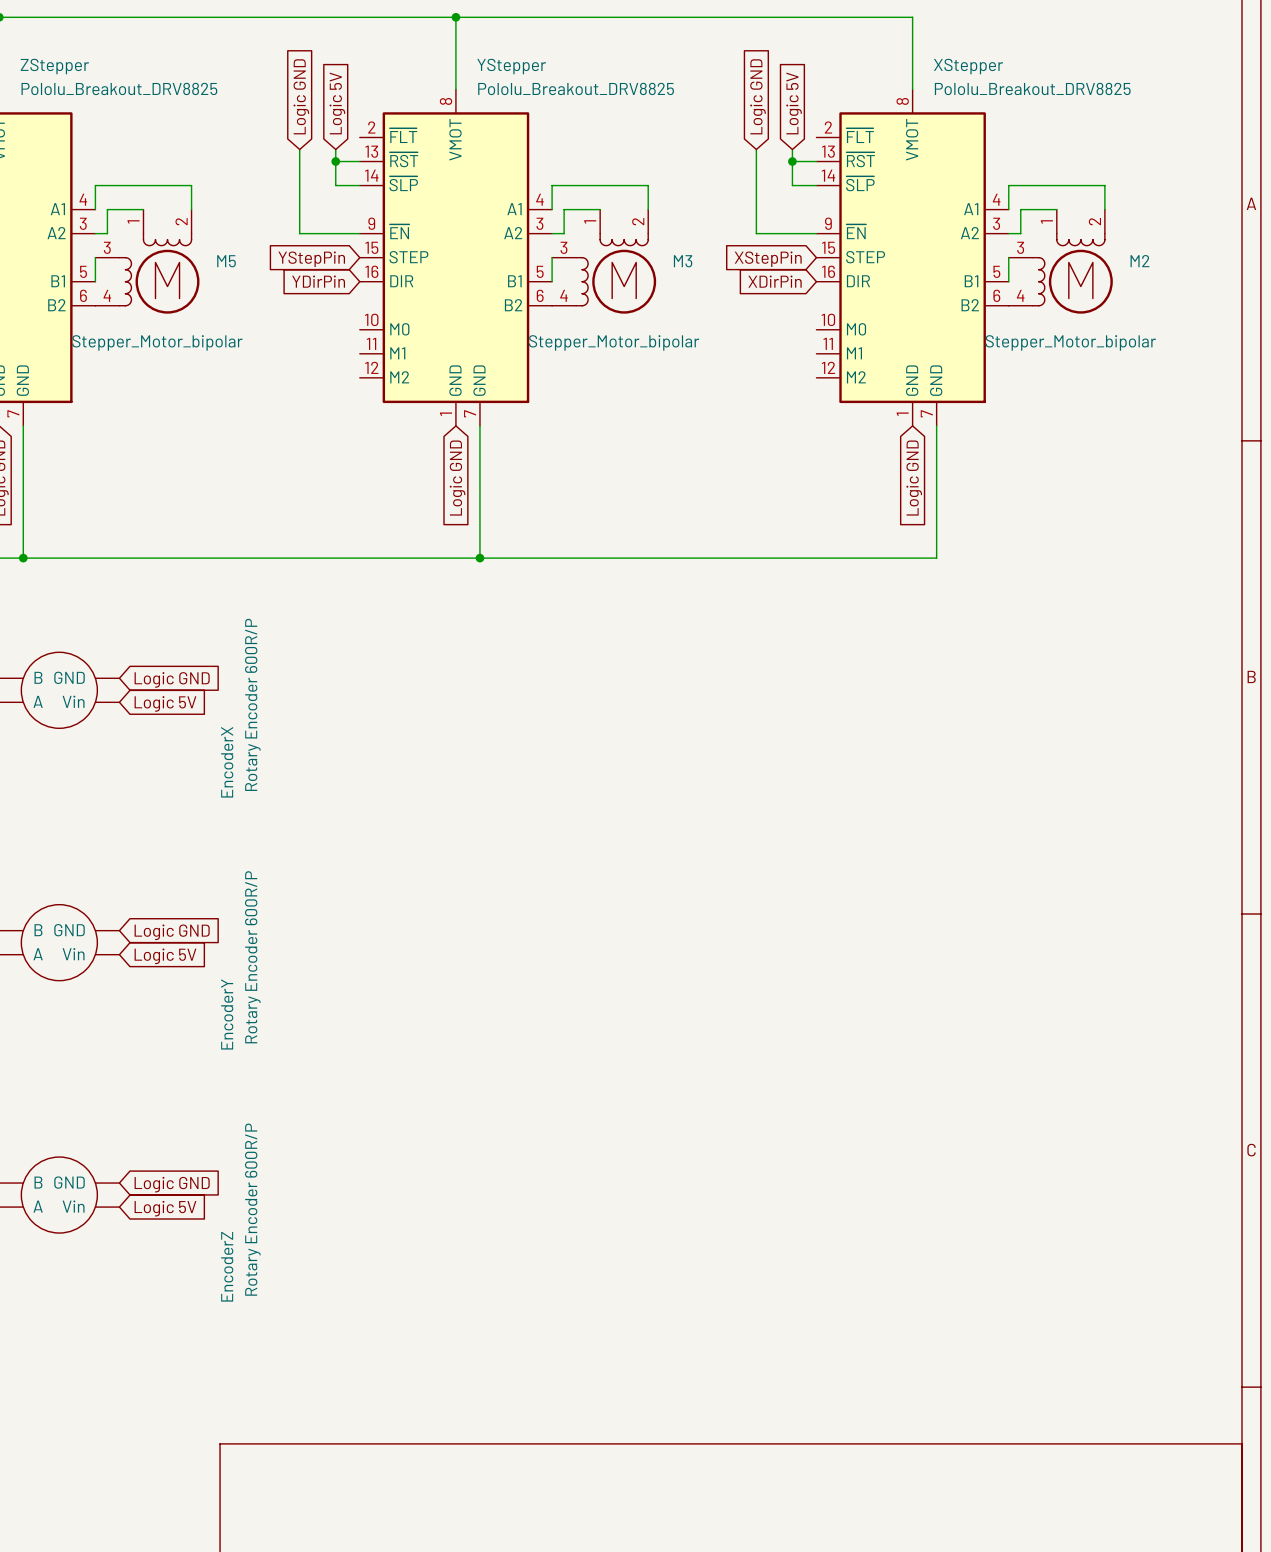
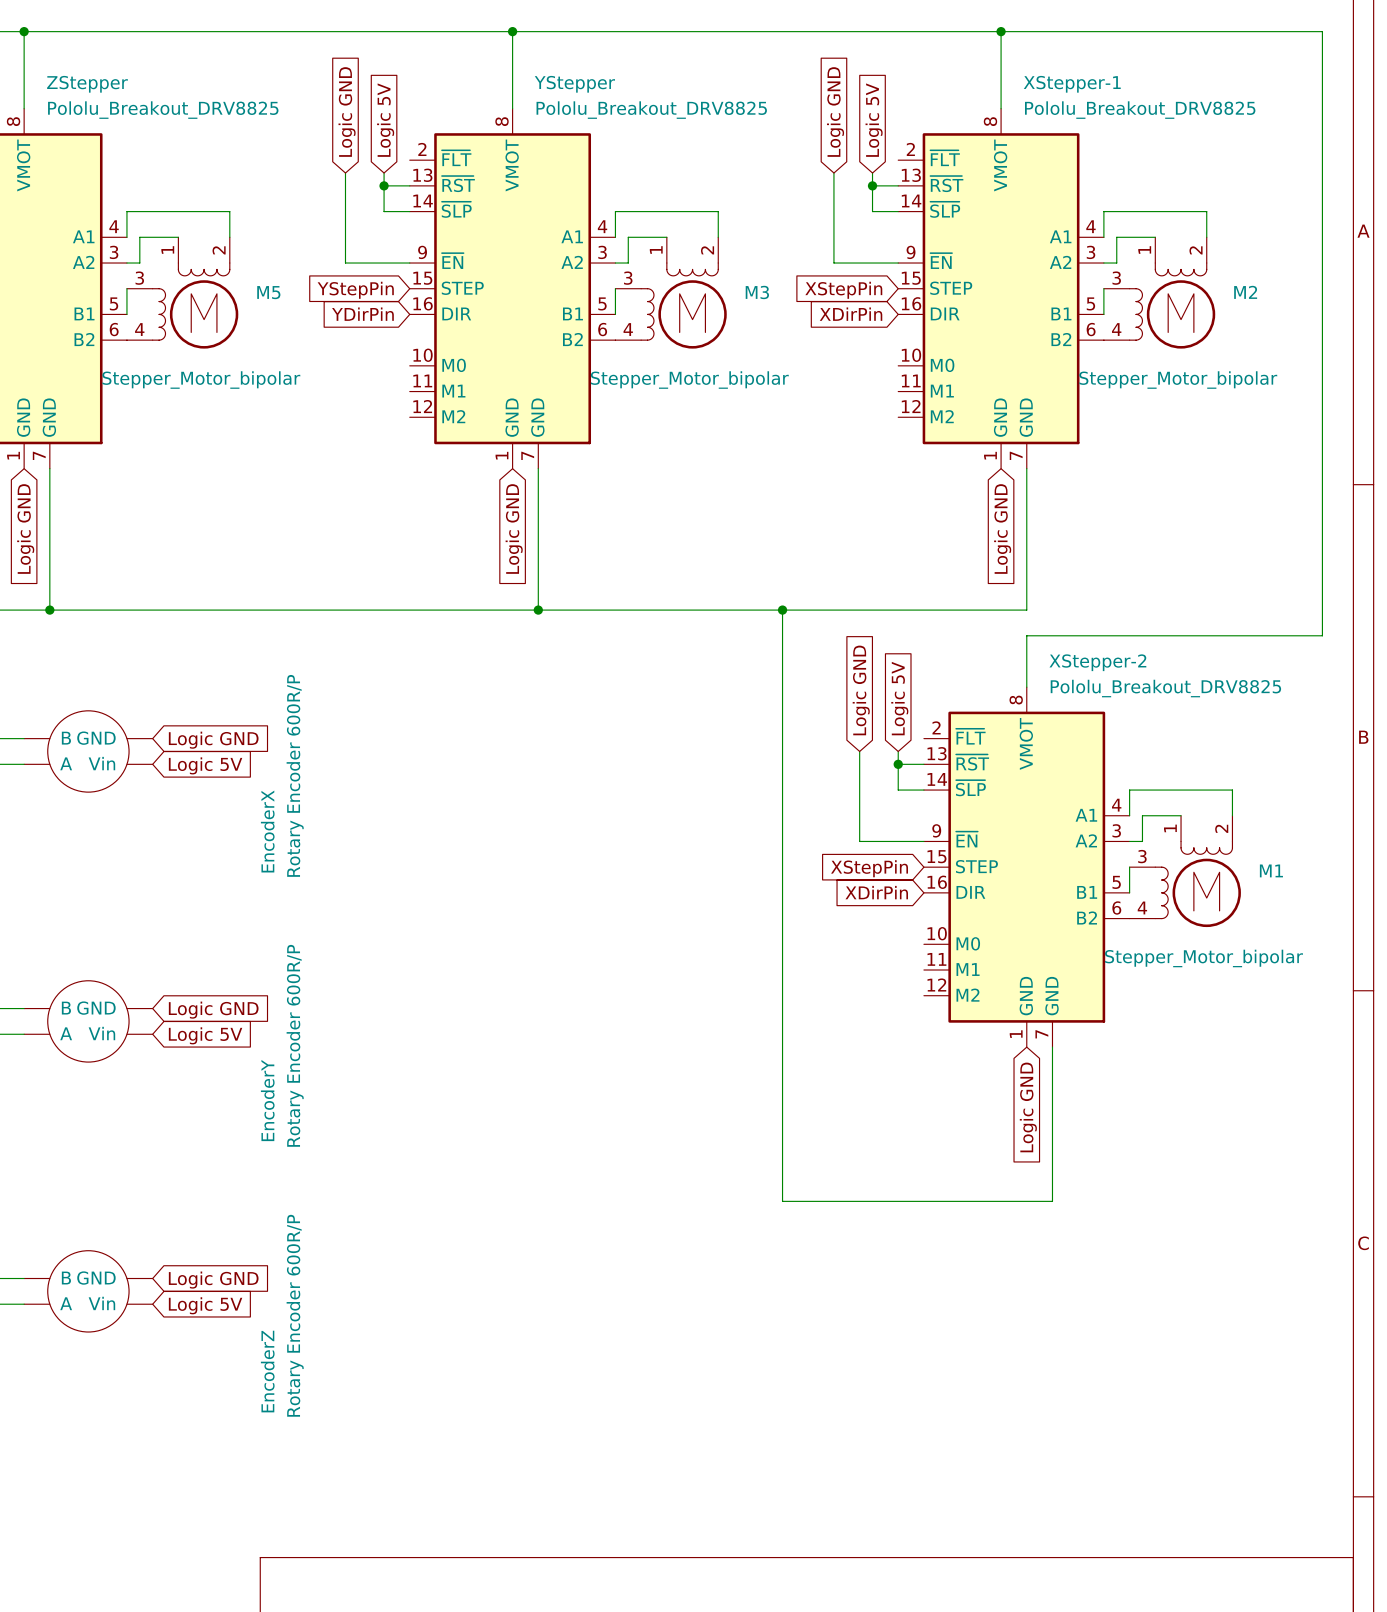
wire: none -> (1001, 31) (1322, 31) (1322, 635) (1026, 635) (1026, 687)
junction: none -> (1001, 31)
XStepper name: XStepper (968, 66) -> XStepper-1 (1072, 84)
wire: none -> (782, 610) (782, 1201) (1052, 1201) (1052, 1047)
junction: none -> (782, 610)
global label: none -> Logic GND (861, 690)
global label: none -> Logic 5V (899, 698)
wire: none -> (859, 751) (859, 841) (923, 841)
wire: none -> (898, 751) (898, 790) (923, 790)
wire: none -> (898, 764) (923, 764)
junction: none -> (898, 764)
wire: none -> (1129, 815) (1129, 790) (1232, 790) (1232, 815)
wire: none -> (1181, 815) (1142, 815) (1142, 841) (1129, 841)
XStepper-2: none -> Pololu_Breakout_DRV8825 (1026, 867)
wire: none -> (1129, 867) (1129, 892)
global label: none -> XStepPin (869, 868)
M1: none -> Stepper_Motor_bipolar (1185, 871)
global label: none -> XDirPin (876, 892)
global label: none -> Logic GND (1028, 1107)

